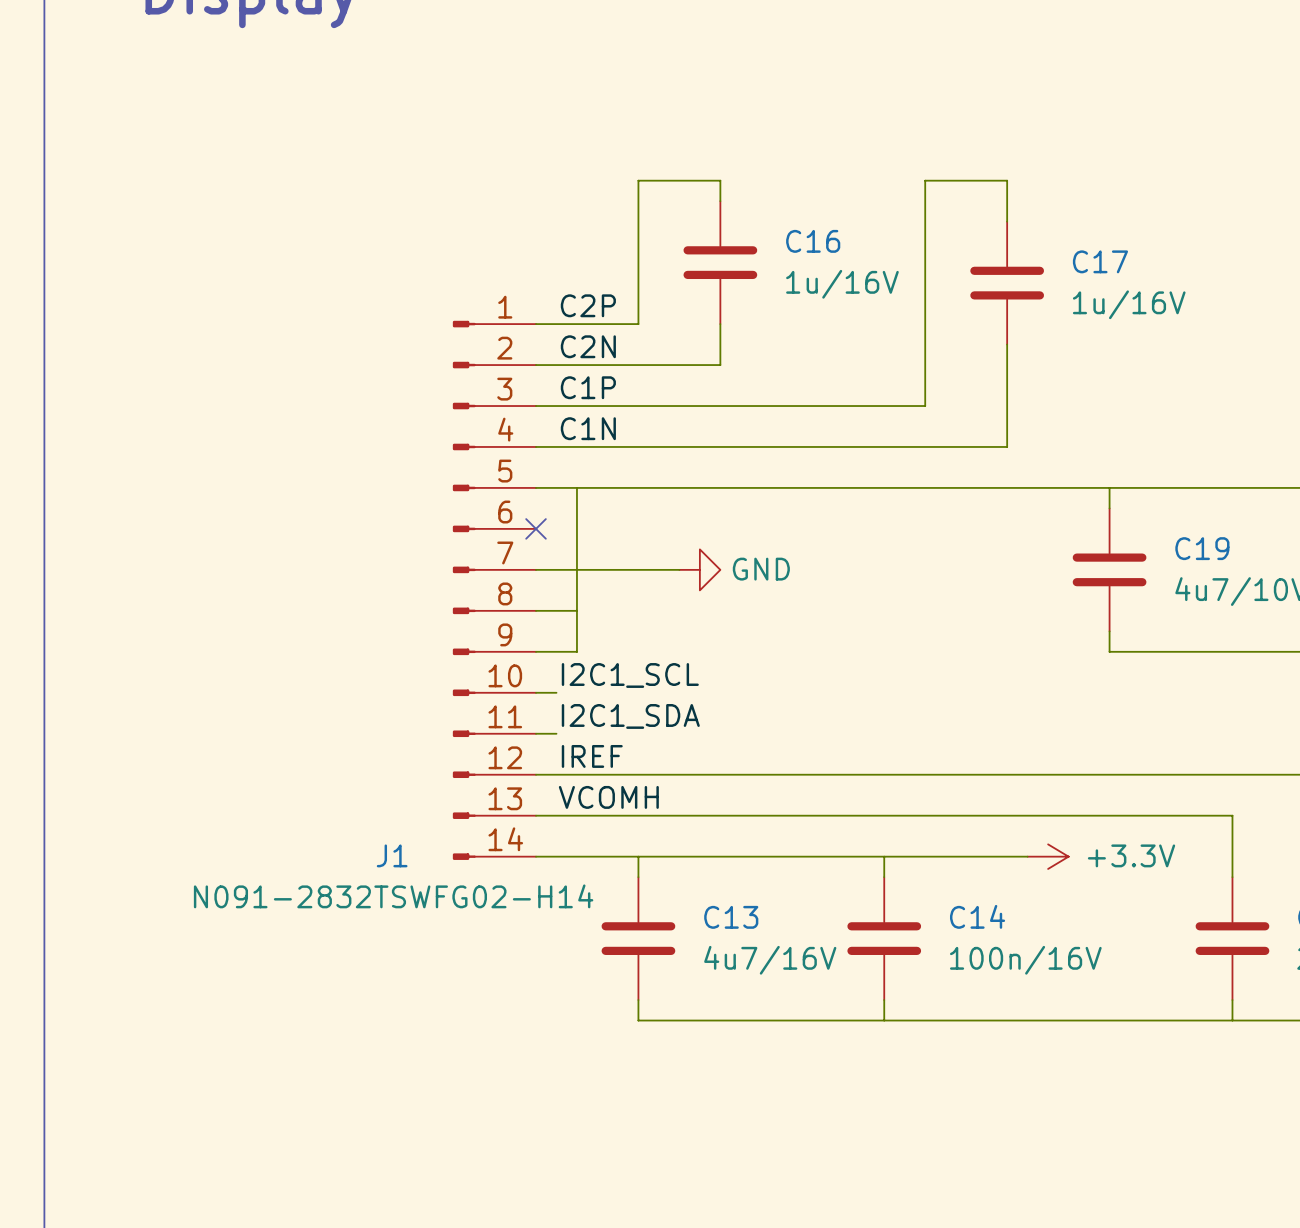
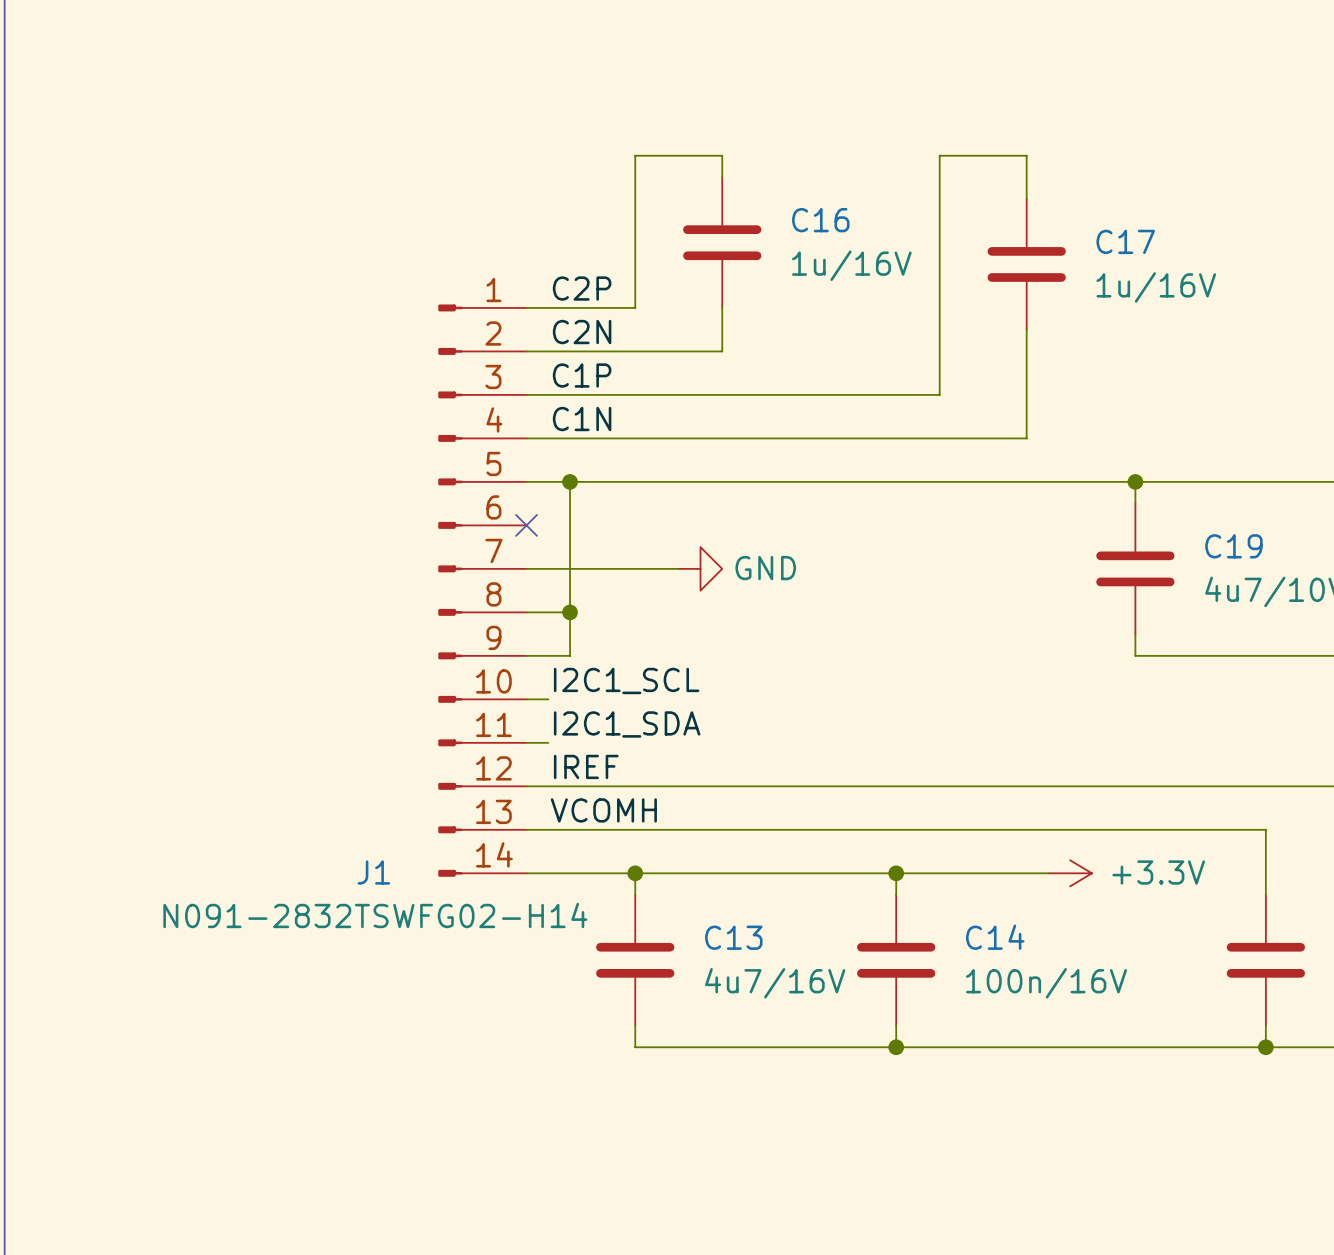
junction: none -> (570, 481)
junction: none -> (1135, 481)
junction: none -> (570, 612)
junction: none -> (635, 873)
junction: none -> (896, 873)
junction: none -> (896, 1047)
junction: none -> (1265, 1047)

